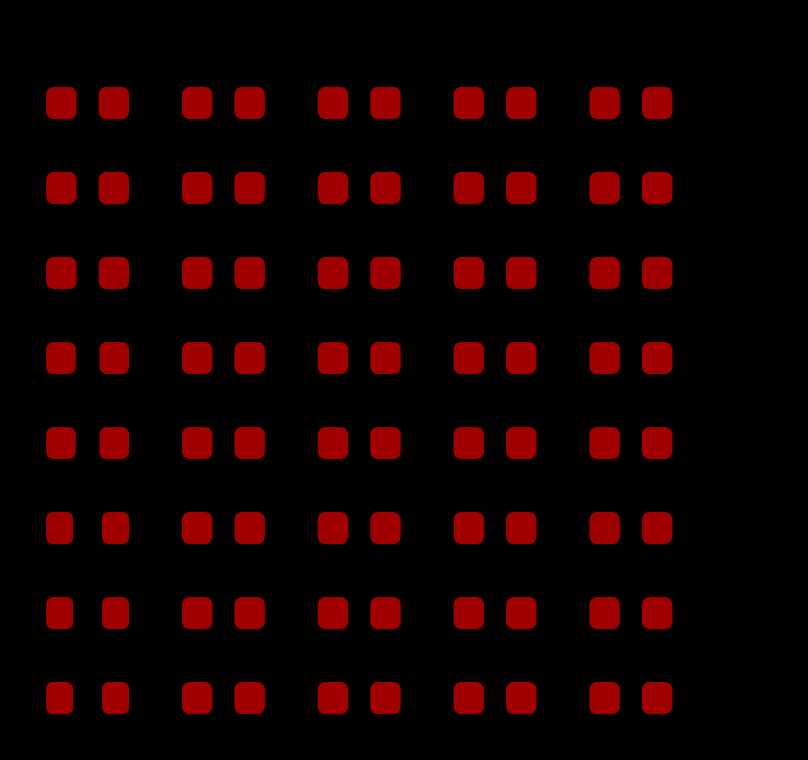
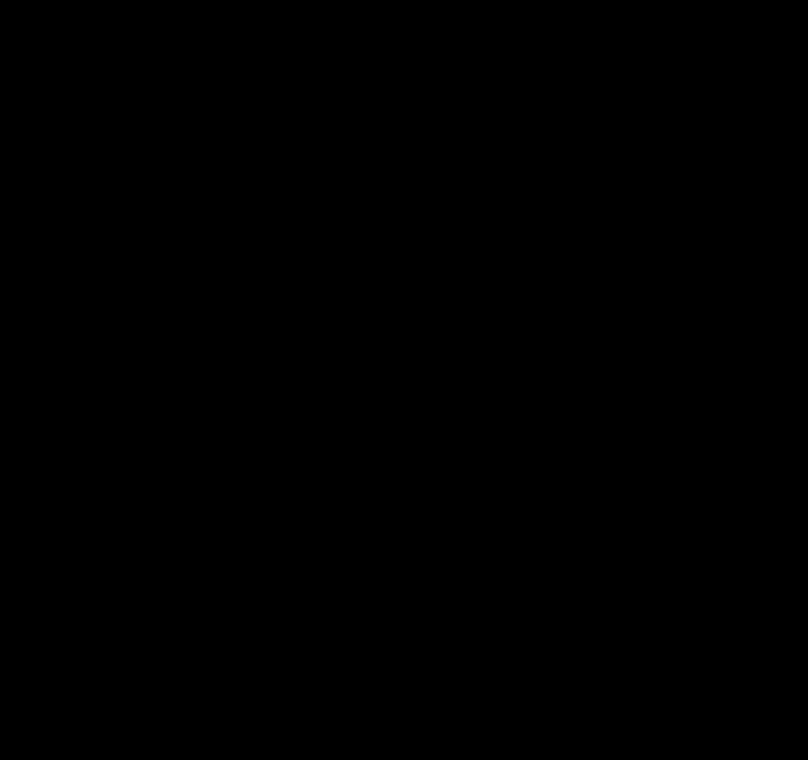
part: (87, 103) -> none
part: (223, 103) -> none
part: (359, 103) -> none
part: (495, 103) -> none
part: (630, 103) -> none
part: (87, 188) -> none
part: (223, 188) -> none
part: (359, 188) -> none
part: (495, 188) -> none
part: (630, 188) -> none
part: (87, 273) -> none
part: (223, 273) -> none
part: (359, 273) -> none
part: (495, 273) -> none
part: (630, 273) -> none
part: (87, 358) -> none
part: (223, 358) -> none
part: (359, 358) -> none
part: (495, 358) -> none
part: (630, 358) -> none
part: (87, 443) -> none
part: (223, 443) -> none
part: (359, 443) -> none
part: (495, 443) -> none
part: (630, 443) -> none
part: (87, 528) -> none
part: (223, 528) -> none
part: (359, 528) -> none
part: (495, 528) -> none
part: (630, 528) -> none
part: (87, 613) -> none
part: (223, 613) -> none
part: (359, 613) -> none
part: (495, 613) -> none
part: (630, 613) -> none
part: (87, 698) -> none
part: (223, 698) -> none
part: (359, 698) -> none
part: (495, 698) -> none
part: (630, 698) -> none

